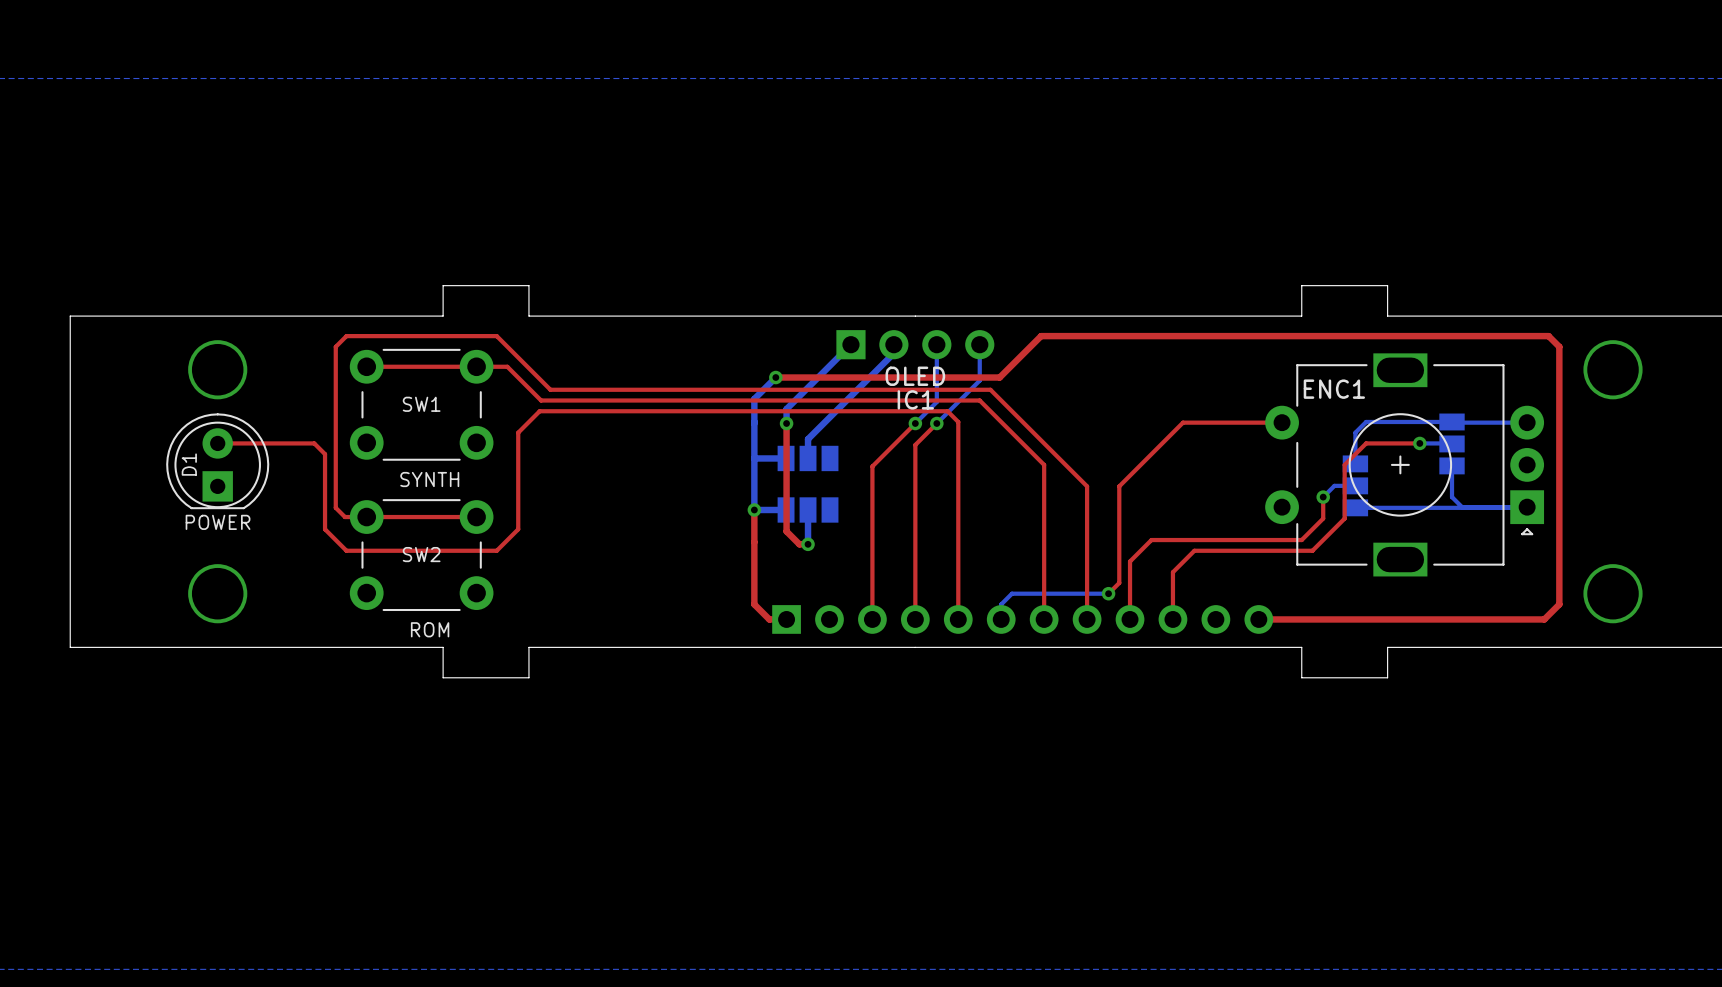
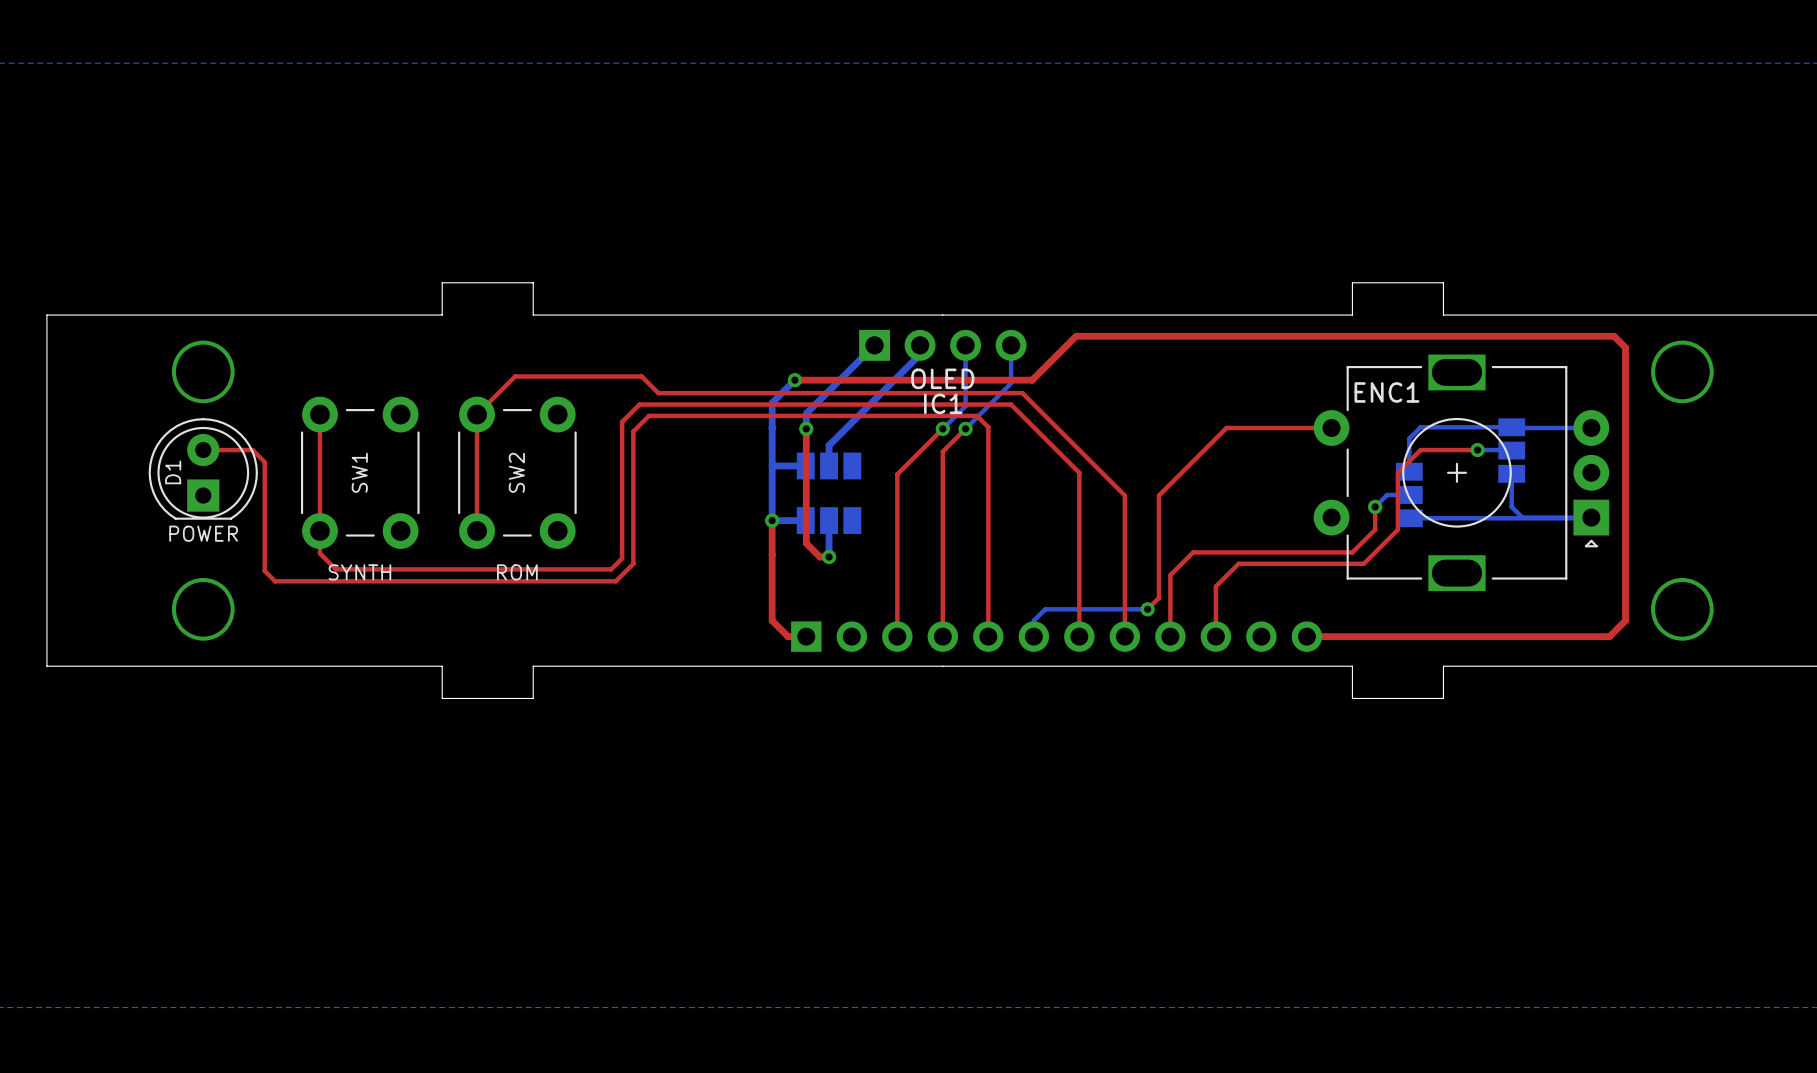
top track: (366, 366) (507, 366) (541, 400) (629, 400) -> (319, 414) (319, 553) (335, 569) (611, 569) (622, 558) (622, 422) (639, 404)
top track: (647, 389) (550, 389) (496, 336) (346, 336) (335, 346) (335, 507) (344, 517) (476, 517) -> (658, 393) (641, 376) (515, 376) (477, 414) (477, 519) (488, 531)
SW1 rotation: 0° (421, 404) -> 90° clockwise (360, 472)
top track: (638, 411) (539, 411) (518, 432) (518, 529) (496, 550) (346, 550) (325, 529) (325, 454) (314, 443) (264, 443) -> (648, 415) (633, 431) (633, 563) (615, 581) (275, 581) (264, 570) (264, 462) (252, 450)
SW2 rotation: 0° (421, 555) -> 90° clockwise (517, 472)
SW2 position: (421, 555) -> (517, 472)

